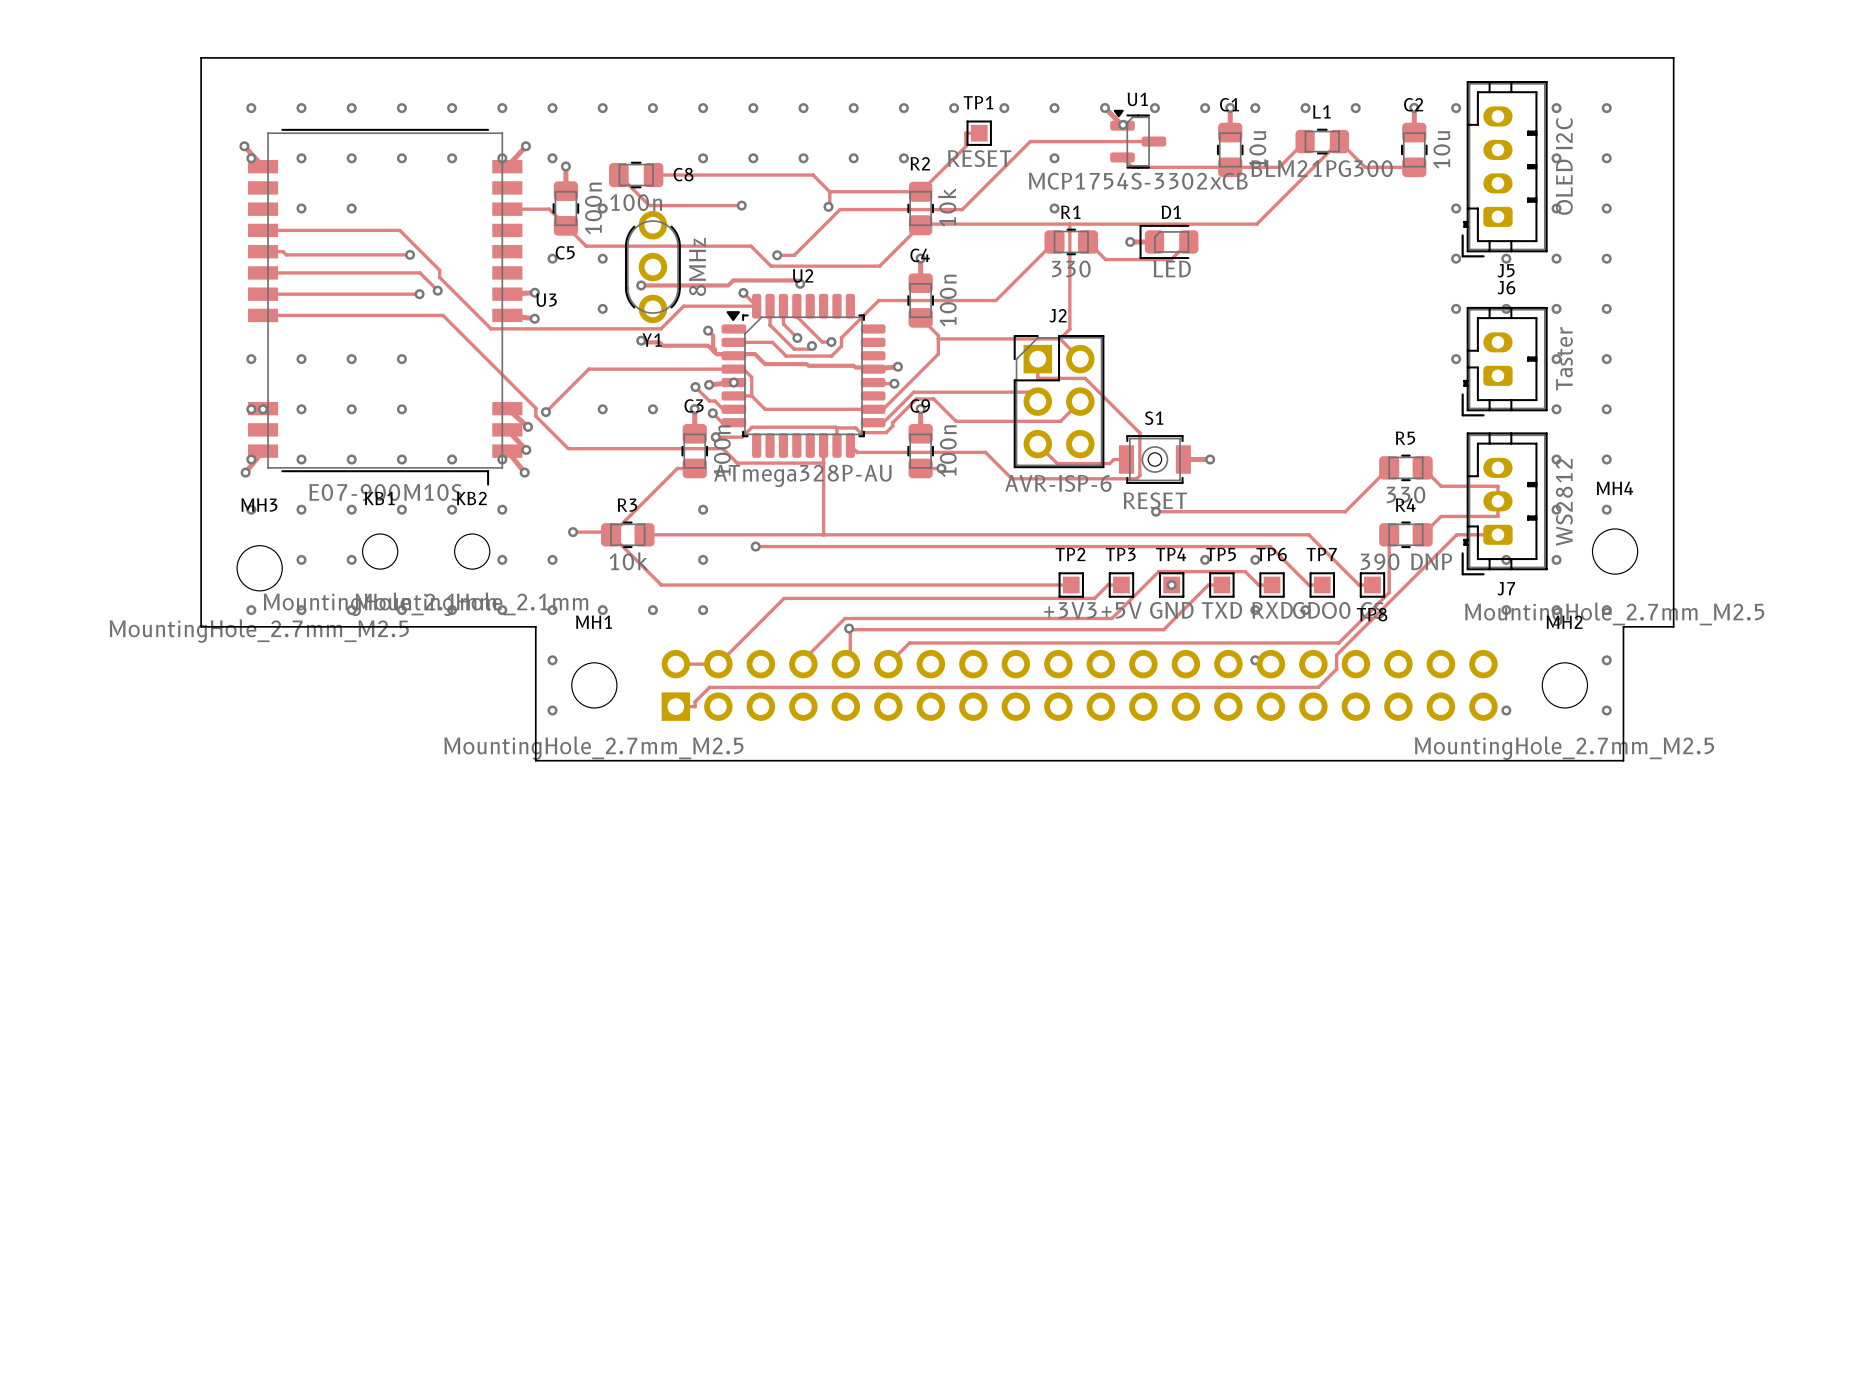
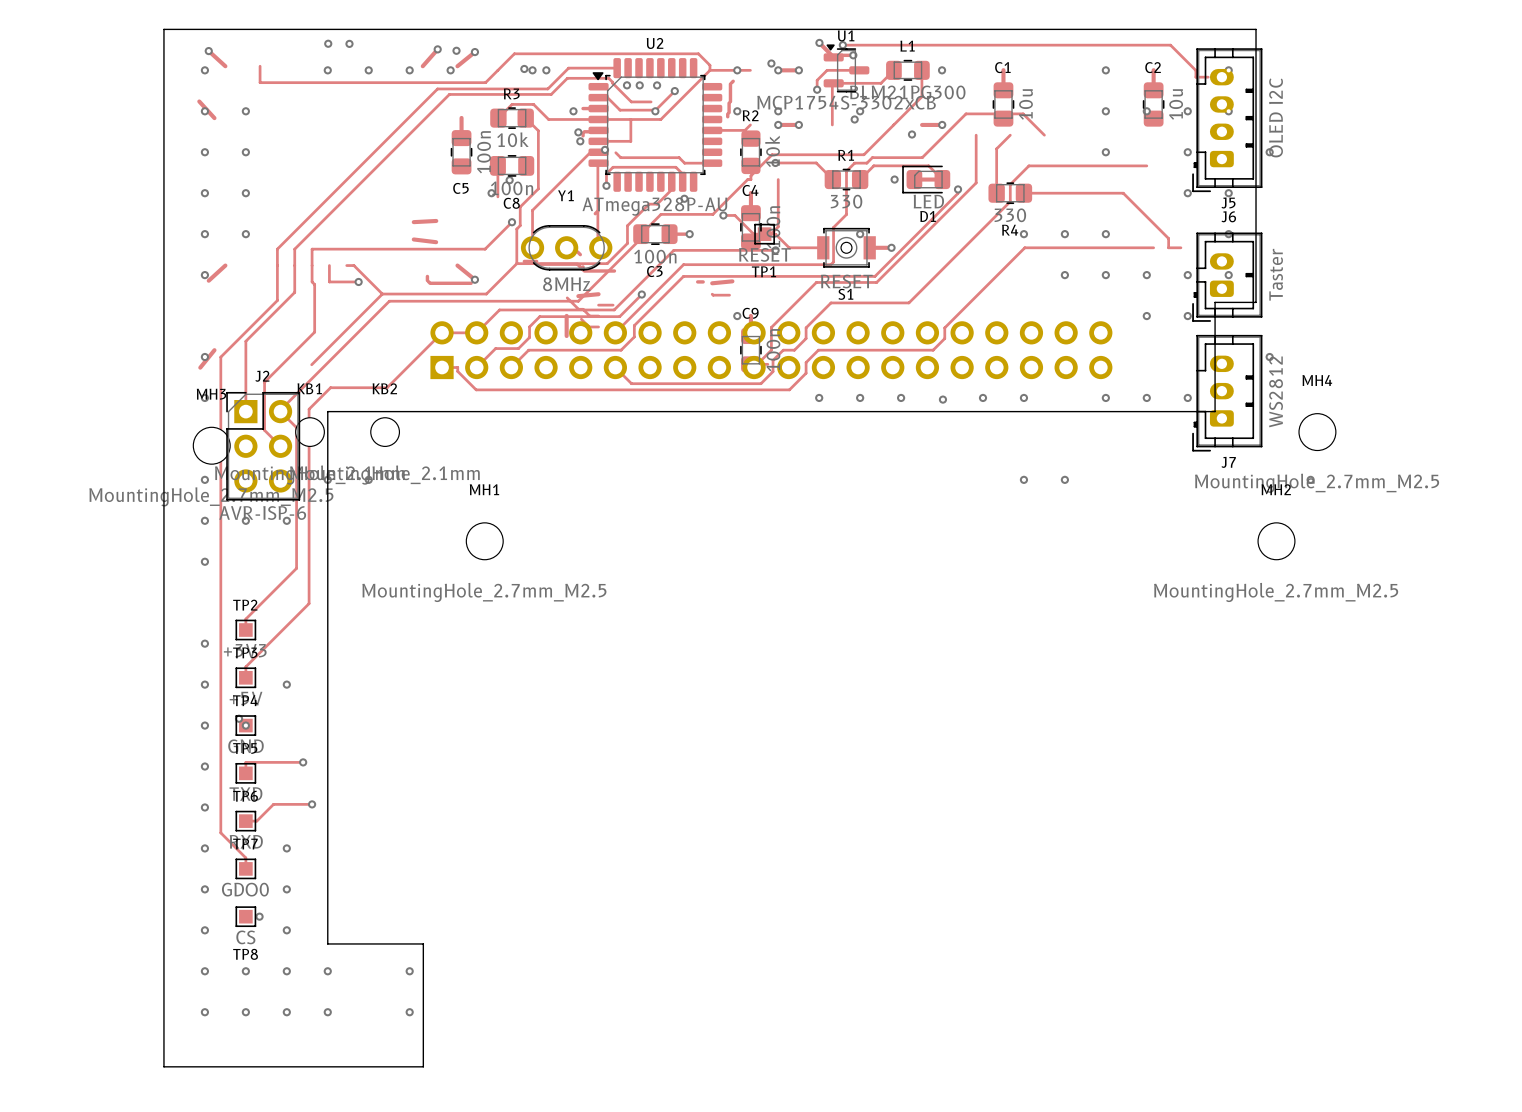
board edge: (1539, 57) (1673, 57) (1673, 626) (1623, 626) (1623, 760) (535, 760) (535, 626) (201, 626) -> (1256, 29) (1256, 302) (1215, 302) (1215, 411) (327, 411) (327, 943) (423, 943) (423, 1066) (163, 1066) (163, 493)
via: none -> (819, 42)
via: none -> (328, 43)
via: none -> (349, 43)
track: none -> (842, 45) (1170, 45) (1195, 70) (1195, 77) (1208, 77)
via: none -> (842, 45)
via: none -> (437, 49)
via: none -> (208, 51)
via: none -> (456, 50)
track: none -> (474, 52) (457, 66)
via: none -> (474, 52)
track: none -> (842, 55) (853, 55)
via: none -> (853, 55)
via: none -> (771, 63)
TP1 name position: TP1 (978, 102) -> TP1 (763, 271)
track: none -> (260, 66) (260, 82) (485, 82) (514, 53) (698, 53) (709, 65) (709, 70)
track: none -> (617, 68) (568, 68) (547, 88) (437, 88) (277, 249) (277, 300) (220, 357) (220, 832) (245, 857) (245, 868)
via: none -> (524, 68)
track: (1105, 107) (1122, 125) -> (819, 42) (833, 57)
via: (1105, 107) -> none
via: (1230, 107) -> none
via: (1414, 107) -> none
via: (301, 108) -> none
via: (351, 108) -> none
via: (602, 108) -> none
via: none -> (546, 70)
via: (703, 108) -> none
via: (753, 108) -> none
via: (803, 108) -> none
via: (853, 108) -> none
track: none -> (709, 70) (750, 70)
track: none -> (709, 70) (660, 119) (548, 119) (533, 104) (512, 104) (498, 118)
track: none -> (778, 70) (798, 70)
via: none -> (798, 70)
via: (1004, 108) -> none
track: none -> (859, 70) (827, 70) (817, 80) (817, 89)
via: (1054, 108) -> none
track: none -> (893, 70) (880, 83) (833, 83) (832, 124)
track: none -> (921, 70) (921, 96) (863, 154) (772, 154) (750, 175) (750, 179) (747, 179) (712, 214) (660, 214) (641, 234) (641, 238) (578, 301) (389, 301) (280, 410) (296, 427) (296, 568) (245, 619) (245, 630)
via: (1205, 108) -> none
via: (1255, 108) -> none
via: (1305, 108) -> none
via: (1456, 108) -> none
via: none -> (1228, 70)
via: (1556, 108) -> none
via: (1606, 108) -> none
track: none -> (733, 81) (731, 82)
track: none -> (730, 83) (730, 101)
via: (1123, 124) -> none
via: none -> (627, 85)
via: none -> (639, 85)
via: none -> (657, 85)
via: none -> (817, 89)
track: none -> (674, 91) (655, 110) (620, 110) (607, 97) (598, 97)
via: none -> (674, 91)
track: (979, 133) (965, 133) (965, 146) (920, 191) (829, 191) -> none
TP1 position: (979, 133) -> (764, 234)
U1 position: (1138, 139) -> (846, 68)
track: (1153, 141) (1030, 141) (962, 209) (840, 209) (794, 255) (777, 255) -> none
track: (1305, 141) (1279, 167) (1132, 167) (1122, 157) -> none
L1 position: (1322, 141) -> (907, 70)
via: (244, 146) -> none
track: (525, 146) (507, 166) -> (437, 49) (422, 66)
via: (525, 146) -> none
track: none -> (651, 101) (631, 101) (608, 78) (567, 78) (551, 94) (449, 94) (294, 249) (294, 292) (245, 341) (245, 411)
track: none -> (583, 108) (589, 108)
via: (351, 158) -> none
via: (401, 158) -> none
via: (452, 158) -> none
via: (502, 158) -> none
via: (552, 158) -> none
via: (753, 158) -> none
via: (853, 158) -> none
via: none -> (778, 111)
via: none -> (1105, 111)
via: none -> (1146, 111)
via: none -> (1187, 111)
via: none -> (1228, 111)
via: (1556, 158) -> none
via: (1606, 158) -> none
track: none -> (727, 114) (727, 116)
via: (565, 166) -> none
track: none -> (525, 118) (538, 130) (538, 188) (520, 207) (520, 225) (516, 229) (516, 263)
track: (1414, 167) (1365, 167) (1339, 141) (1256, 224) (921, 224) (879, 266) (771, 266) (751, 246) (586, 246) (549, 209) (507, 209) -> none
track: none -> (630, 119) (630, 141) (598, 141)
via: none -> (854, 119)
C8 name position: C8 (683, 174) -> C8 (511, 203)
track: (618, 175) (649, 205) (741, 205) -> none
C8 position: (636, 175) -> (512, 165)
track: (653, 175) (813, 175) (829, 191) -> none
track: none -> (750, 124) (744, 130) (712, 130)
track: none -> (778, 124) (798, 124)
via: none -> (778, 124)
via: none -> (798, 124)
track: none -> (922, 124) (942, 124)
via: none -> (942, 124)
track: none -> (584, 131) (589, 131)
via: none -> (578, 132)
track: none -> (583, 133) (583, 135)
via: none -> (912, 134)
track: none -> (976, 135) (976, 182) (876, 282) (816, 282) (771, 327) (771, 350) (754, 367)
track: none -> (1010, 135) (996, 148) (996, 193)
track: none -> (1044, 135) (1023, 113) (966, 113) (922, 157) (872, 157) (866, 163) (854, 163) (846, 171) (846, 214) (833, 227) (833, 262) (830, 264) (683, 264) (615, 332)
track: (829, 191) (828, 206) -> none
via: none -> (580, 141)
via: (828, 206) -> none
via: none -> (204, 152)
via: (351, 208) -> none
via: (602, 208) -> none
track: none -> (598, 152) (590, 152) (532, 210) (532, 247)
via: (1054, 208) -> none
via: none -> (1105, 152)
via: (1606, 208) -> none
track: none -> (615, 152) (620, 157) (679, 157) (684, 163) (712, 163)
D1 name position: D1 (1171, 212) -> D1 (928, 216)
track: none -> (598, 163) (597, 244) (600, 247)
track: none -> (775, 162) (816, 162) (832, 179)
via: none -> (775, 162)
track: (1069, 224) (1069, 329) (1060, 338) -> none
track: none -> (497, 165) (497, 196)
track: none -> (1146, 165) (1028, 165) (1010, 184) (1010, 201) (908, 302) (831, 302) (806, 327) (806, 338) (794, 350) (783, 350) (773, 360) (773, 371) (760, 383) (631, 383) (615, 367)
track: (263, 230) (399, 230) (439, 270) (439, 277) (491, 328) (660, 328) (683, 306) (756, 306) (743, 292) -> none
track: none -> (778, 179) (778, 226) (770, 234)
track: (1054, 241) (995, 300) (878, 300) (841, 337) (841, 346) (831, 356) (786, 356) (772, 342) (733, 342) -> (860, 179) (873, 165) (928, 165) (942, 179)
R1 position: (1071, 241) -> (846, 179)
track: (1087, 241) (1105, 259) (1171, 259) (1188, 241) -> none
via: none -> (894, 179)
via: (1130, 241) -> none
D1 position: (1168, 241) -> (926, 179)
via: none -> (509, 180)
track: none -> (671, 181) (671, 189) (657, 204) (649, 204) (627, 225) (627, 243) (607, 263) (516, 263)
track: none -> (682, 181) (682, 174) (675, 167) (613, 167) (606, 173) (606, 185)
via: none -> (606, 185)
track: (263, 251) (283, 251) (286, 254) (410, 254) -> none
via: (410, 254) -> none
track: none -> (958, 189) (958, 193) (874, 276) (683, 276) (634, 325) (634, 336) (621, 350) (528, 350) (511, 367)
via: none -> (958, 189)
via: (777, 255) -> none
via: none -> (204, 193)
via: none -> (245, 193)
via: (552, 258) -> none
via: (920, 258) -> none
track: none -> (1023, 193) (1123, 193) (1168, 238) (1168, 247) (1180, 247)
via: (1556, 258) -> none
via: (1606, 258) -> none
via: none -> (684, 198)
Y1 rotation: 0° (652, 267) -> 90° clockwise (566, 247)
Y1 position: (652, 267) -> (566, 247)
track: (263, 272) (420, 272) (437, 290) -> none
track: (734, 280) (796, 280) -> none
via: (800, 283) -> none
track: (641, 285) (728, 285) -> none
via: (641, 285) -> none
track: none -> (723, 215) (734, 215) (753, 234) (775, 234) (789, 247) (823, 247)
via: none -> (723, 215)
via: (437, 290) -> none
via: (534, 292) -> none
via: (743, 292) -> none
track: (263, 294) (419, 294) -> none
via: (419, 294) -> none
track: none -> (512, 222) (485, 249) (312, 249) (314, 332) (264, 382) (264, 430) (280, 446)
via: none -> (512, 222)
track: (770, 306) (770, 325) (794, 349) (808, 349) (811, 345) -> none
track: (783, 306) (783, 324) (797, 338) -> none
track: (796, 306) (796, 316) (822, 342) (831, 342) -> none
U3: E07-900M10S (385, 307) -> none
via: none -> (204, 234)
via: none -> (245, 234)
via: (602, 308) -> none
track: none -> (675, 234) (689, 234)
via: none -> (689, 234)
via: none -> (860, 234)
via: none -> (1023, 234)
via: none -> (1064, 234)
via: none -> (1105, 234)
via: (1456, 308) -> none
via: (1556, 308) -> none
via: (1606, 308) -> none
track: (263, 315) (443, 315) (535, 408) (535, 416) (568, 448) (722, 448) (737, 463) (823, 463) -> none
track: (920, 317) (938, 335) (938, 354) (883, 409) (765, 409) (751, 395) (751, 377) (743, 369) (588, 369) (545, 412) -> none
via: (534, 318) -> none
via: none -> (891, 247)
track: none -> (1153, 247) (1024, 247) (944, 327) (944, 338) (933, 350) (818, 350) (806, 362) (806, 373) (789, 389) (476, 389) (457, 371) (457, 367) (442, 367)
track: none -> (775, 250) (673, 250) (614, 309) (499, 309) (476, 332) (442, 332) (387, 387) (330, 387) (309, 409) (309, 603) (245, 666) (245, 677)
via: none -> (775, 250)
via: (708, 330) -> none
track: (713, 335) (713, 347) -> (729, 103) (729, 112)
via: (797, 338) -> none
track: (938, 338) (1060, 338) -> none
track: (1060, 338) (1080, 359) -> none
via: (641, 340) -> none
Y1 name position: Y1 (652, 340) -> Y1 (565, 195)
track: (659, 342) (661, 344) -> (428, 281) (430, 283)
via: (831, 342) -> none
track: none -> (516, 263) (486, 294) (382, 294)
via: (811, 345) -> none
track: none -> (225, 265) (208, 280)
track: none -> (329, 265) (329, 281) (358, 281)
track: none -> (346, 265) (353, 265) (382, 294)
track: none -> (457, 265) (474, 279)
track: (754, 354) (763, 362) -> none
via: (301, 359) -> none
via: (351, 359) -> none
via: (401, 359) -> none
track: (1037, 359) (1037, 378) (1085, 378) (1139, 433) (1139, 475) (1136, 478) (1011, 478) (985, 452) (857, 452) (850, 445) -> none
via: none -> (1064, 275)
via: none -> (1105, 275)
via: none -> (1146, 275)
via: none -> (1228, 275)
via: (1556, 359) -> none
via: (1606, 359) -> none
track: none -> (427, 276) (427, 280)
via: none -> (474, 279)
track: (765, 364) (806, 364) -> none
track: (808, 365) (853, 365) -> none
via: (897, 366) -> none
via: none -> (358, 281)
track: none -> (431, 283) (471, 283)
U2 position: (803, 375) -> (655, 124)
track: none -> (382, 294) (311, 364)
via: (733, 382) -> none
track: none -> (641, 294) (619, 316) (539, 316) (529, 326) (529, 337) (518, 348) (495, 348) (476, 367)
via: none -> (641, 294)
via: (894, 383) -> none
via: (709, 384) -> none
via: (695, 387) -> none
track: (1037, 401) (1028, 392) (913, 392) (883, 422) (873, 422) -> none
J2 position: (1059, 401) -> (263, 446)
track: (1080, 401) (1060, 421) (956, 421) (933, 398) (916, 398) (892, 422) (892, 426) (886, 432) (860, 432) (855, 427) (837, 427) -> none
C3 name position: C3 (694, 405) -> C3 (654, 271)
track: (507, 408) (528, 426) -> (208, 51) (225, 66)
via: (251, 409) -> none
via: (263, 409) -> none
via: (301, 409) -> none
via: (351, 409) -> none
via: (401, 409) -> none
via: (602, 409) -> none
via: (652, 409) -> none
via: (694, 409) -> none
via: none -> (737, 316)
via: (920, 409) -> none
via: none -> (1146, 316)
via: none -> (1187, 316)
via: (1556, 409) -> none
via: (1606, 409) -> none
via: (545, 412) -> none
via: (712, 413) -> none
S1 name position: S1 (1154, 418) -> S1 (845, 294)
via: (528, 426) -> none
track: (507, 429) (526, 449) -> none
track: (715, 437) (742, 437) (752, 427) (836, 427) (836, 445) -> none
via: (715, 437) -> none
track: (1037, 444) (1057, 463) (1109, 463) (1113, 459) (1126, 459) -> none
track: (823, 445) (823, 534) -> none
via: (526, 449) -> none
track: (507, 451) (524, 472) -> none
C3 rotation: 0° (694, 451) -> 90° clockwise (655, 234)
C3 position: (694, 451) -> (655, 234)
via: (301, 459) -> none
via: (351, 459) -> none
via: (401, 459) -> none
via: (452, 459) -> none
via: (502, 459) -> none
S1 position: (1154, 459) -> (846, 247)
track: (1183, 459) (1210, 459) -> (869, 247) (891, 247)
via: (1210, 459) -> none
via: (1606, 459) -> none
track: (1389, 467) (1345, 511) (1156, 511) -> none
R5: 330 (1405, 467) -> none
track: (1422, 467) (1441, 486) (1497, 486) (1497, 516) (1441, 516) (1422, 534) -> none
track: (694, 468) (677, 468) (611, 534) -> none
via: (941, 468) -> none
via: (245, 472) -> none
via: (524, 472) -> none
R4 name position: R4 (1405, 505) -> R4 (1010, 230)
via: (301, 509) -> none
via: (351, 509) -> none
via: (401, 509) -> none
via: (452, 509) -> none
via: (502, 509) -> none
via: (703, 509) -> none
via: none -> (819, 397)
via: none -> (860, 397)
via: none -> (901, 397)
via: none -> (983, 397)
via: none -> (1023, 397)
via: none -> (1105, 397)
via: none -> (1146, 397)
via: none -> (1187, 397)
via: (1556, 509) -> none
via: (1606, 509) -> none
track: (573, 532) (608, 532) (661, 585) (1071, 585) -> none
via: (573, 532) -> none
R3 position: (627, 534) -> (512, 118)
track: (644, 534) (1308, 534) (1359, 585) (1372, 585) -> none
track: (1389, 534) (1389, 592) (1338, 643) (909, 643) (888, 664) -> none
R4 position: (1405, 534) -> (1010, 193)
track: (1497, 534) (1456, 534) (1336, 654) (1336, 669) (1318, 687) (709, 687) (695, 701) (695, 706) (675, 706) -> none
track: (755, 546) (1270, 546) (1308, 585) (1322, 585) -> none
via: (755, 546) -> none
via: (301, 559) -> none
via: (351, 559) -> none
via: (502, 559) -> none
via: (552, 559) -> none
via: (703, 559) -> none
via: (1205, 559) -> none
via: (1255, 559) -> none
via: (1506, 559) -> none
via: (1556, 559) -> none
R4 value: 390 DNP (1406, 561) -> 330 (1010, 215)
TP2 position: (1071, 585) -> (245, 630)
track: (1121, 585) (1108, 585) (1094, 598) (784, 598) (718, 664) (675, 664) -> none
TP3 position: (1121, 585) -> (245, 677)
TP4 position: (1171, 585) -> (245, 725)
via: (1171, 585) -> none
track: (1221, 585) (1208, 585) (1163, 629) (850, 629) -> none
TP5 position: (1221, 585) -> (245, 773)
track: (1272, 585) (1258, 585) (1245, 571) (1158, 571) (1111, 618) (844, 618) (803, 660) (803, 664) -> none
TP6 position: (1272, 585) -> (245, 821)
TP7 position: (1322, 585) -> (245, 868)
TP8 position: (1372, 585) -> (245, 916)
via: (301, 610) -> none
via: (351, 610) -> none
via: (502, 610) -> none
via: (552, 610) -> none
via: (602, 610) -> none
via: (652, 610) -> none
via: (703, 610) -> none
via: (1506, 610) -> none
via: (1556, 610) -> none
TP8 name position: TP8 (1372, 614) -> TP8 (245, 954)
via: (849, 628) -> none
track: (850, 629) (850, 659) (845, 664) -> none
via: none -> (204, 520)
via: none -> (245, 520)
via: none -> (286, 520)
via: (552, 660) -> none
via: (1255, 660) -> none
via: (1606, 660) -> none
part position: (1079, 685) -> (771, 350)
via: none -> (204, 561)
via: (552, 710) -> none
via: (1506, 710) -> none
via: (1606, 710) -> none
via: none -> (204, 643)
via: none -> (204, 684)
via: none -> (286, 684)
via: none -> (239, 718)
via: none -> (204, 725)
via: none -> (245, 725)
track: none -> (303, 762) (245, 762) (245, 773)
via: none -> (303, 762)
via: none -> (204, 766)
track: none -> (312, 804) (273, 804) (256, 821) (245, 821)
via: none -> (312, 804)
via: none -> (204, 807)
via: none -> (204, 848)
via: none -> (286, 848)
via: none -> (204, 889)
via: none -> (286, 889)
via: none -> (259, 916)
via: none -> (204, 930)
via: none -> (286, 930)
via: none -> (204, 971)
via: none -> (245, 971)
via: none -> (286, 971)
via: none -> (327, 971)
via: none -> (409, 971)
via: none -> (204, 1012)
via: none -> (245, 1012)
via: none -> (286, 1012)
via: none -> (327, 1012)
via: none -> (409, 1012)

